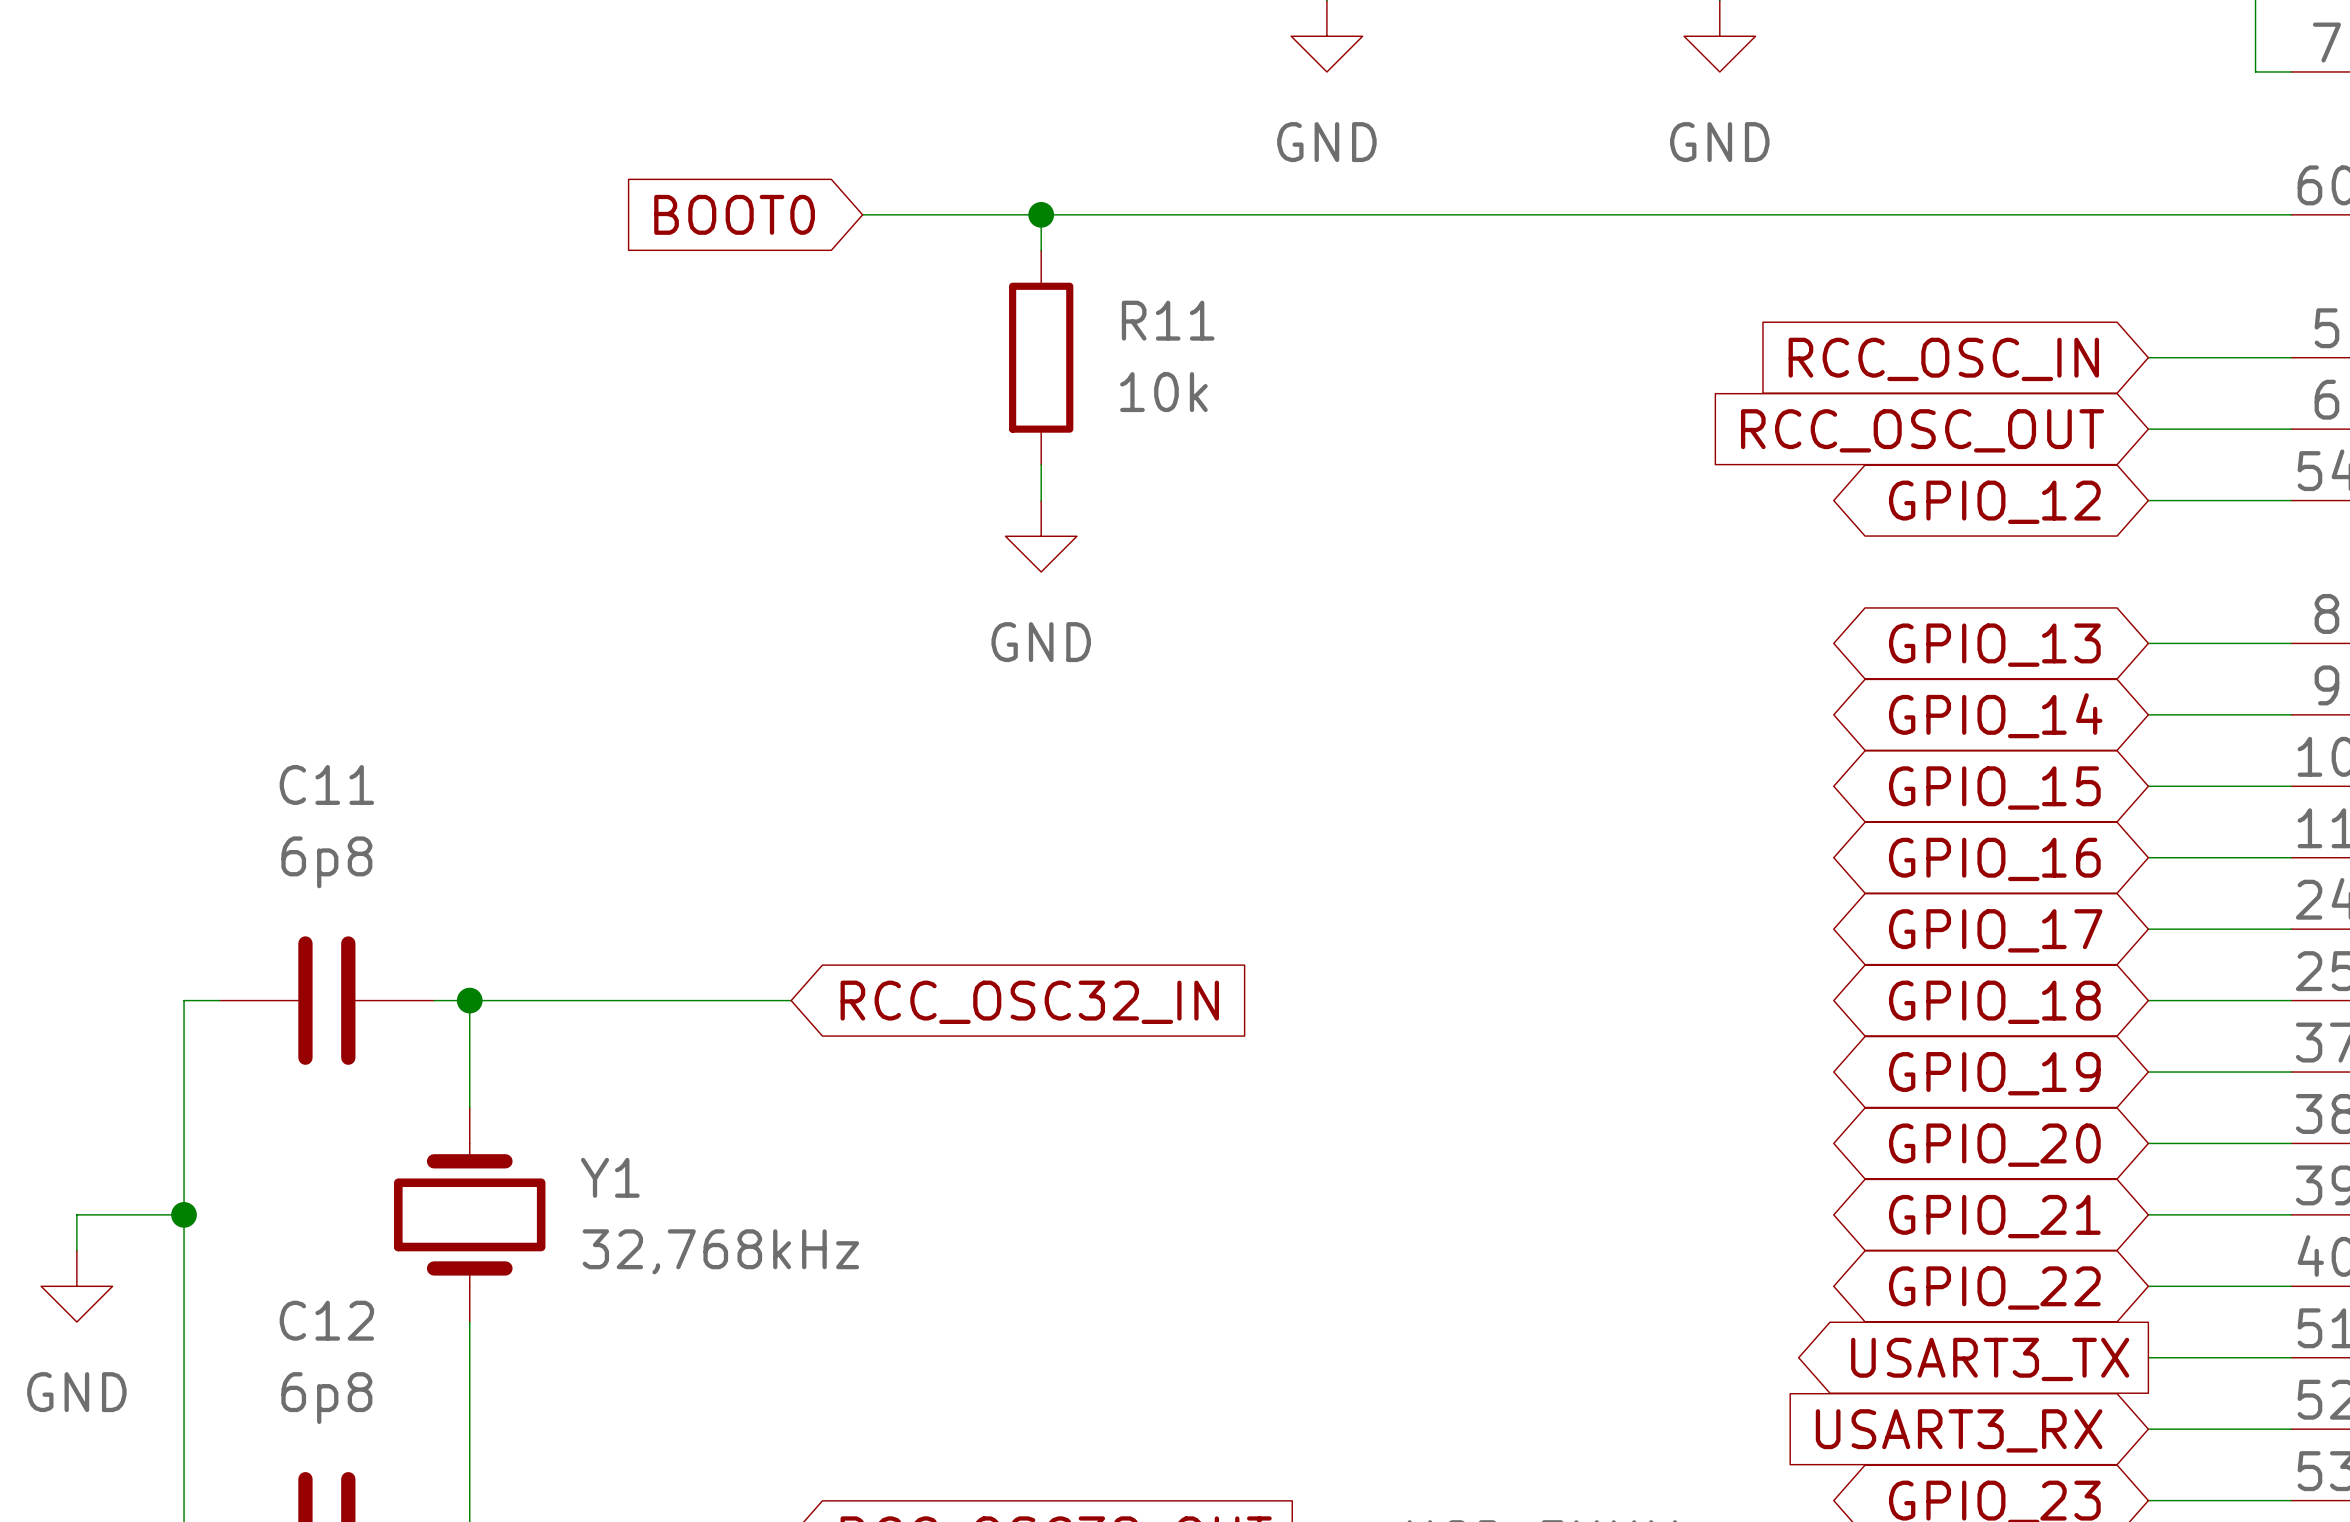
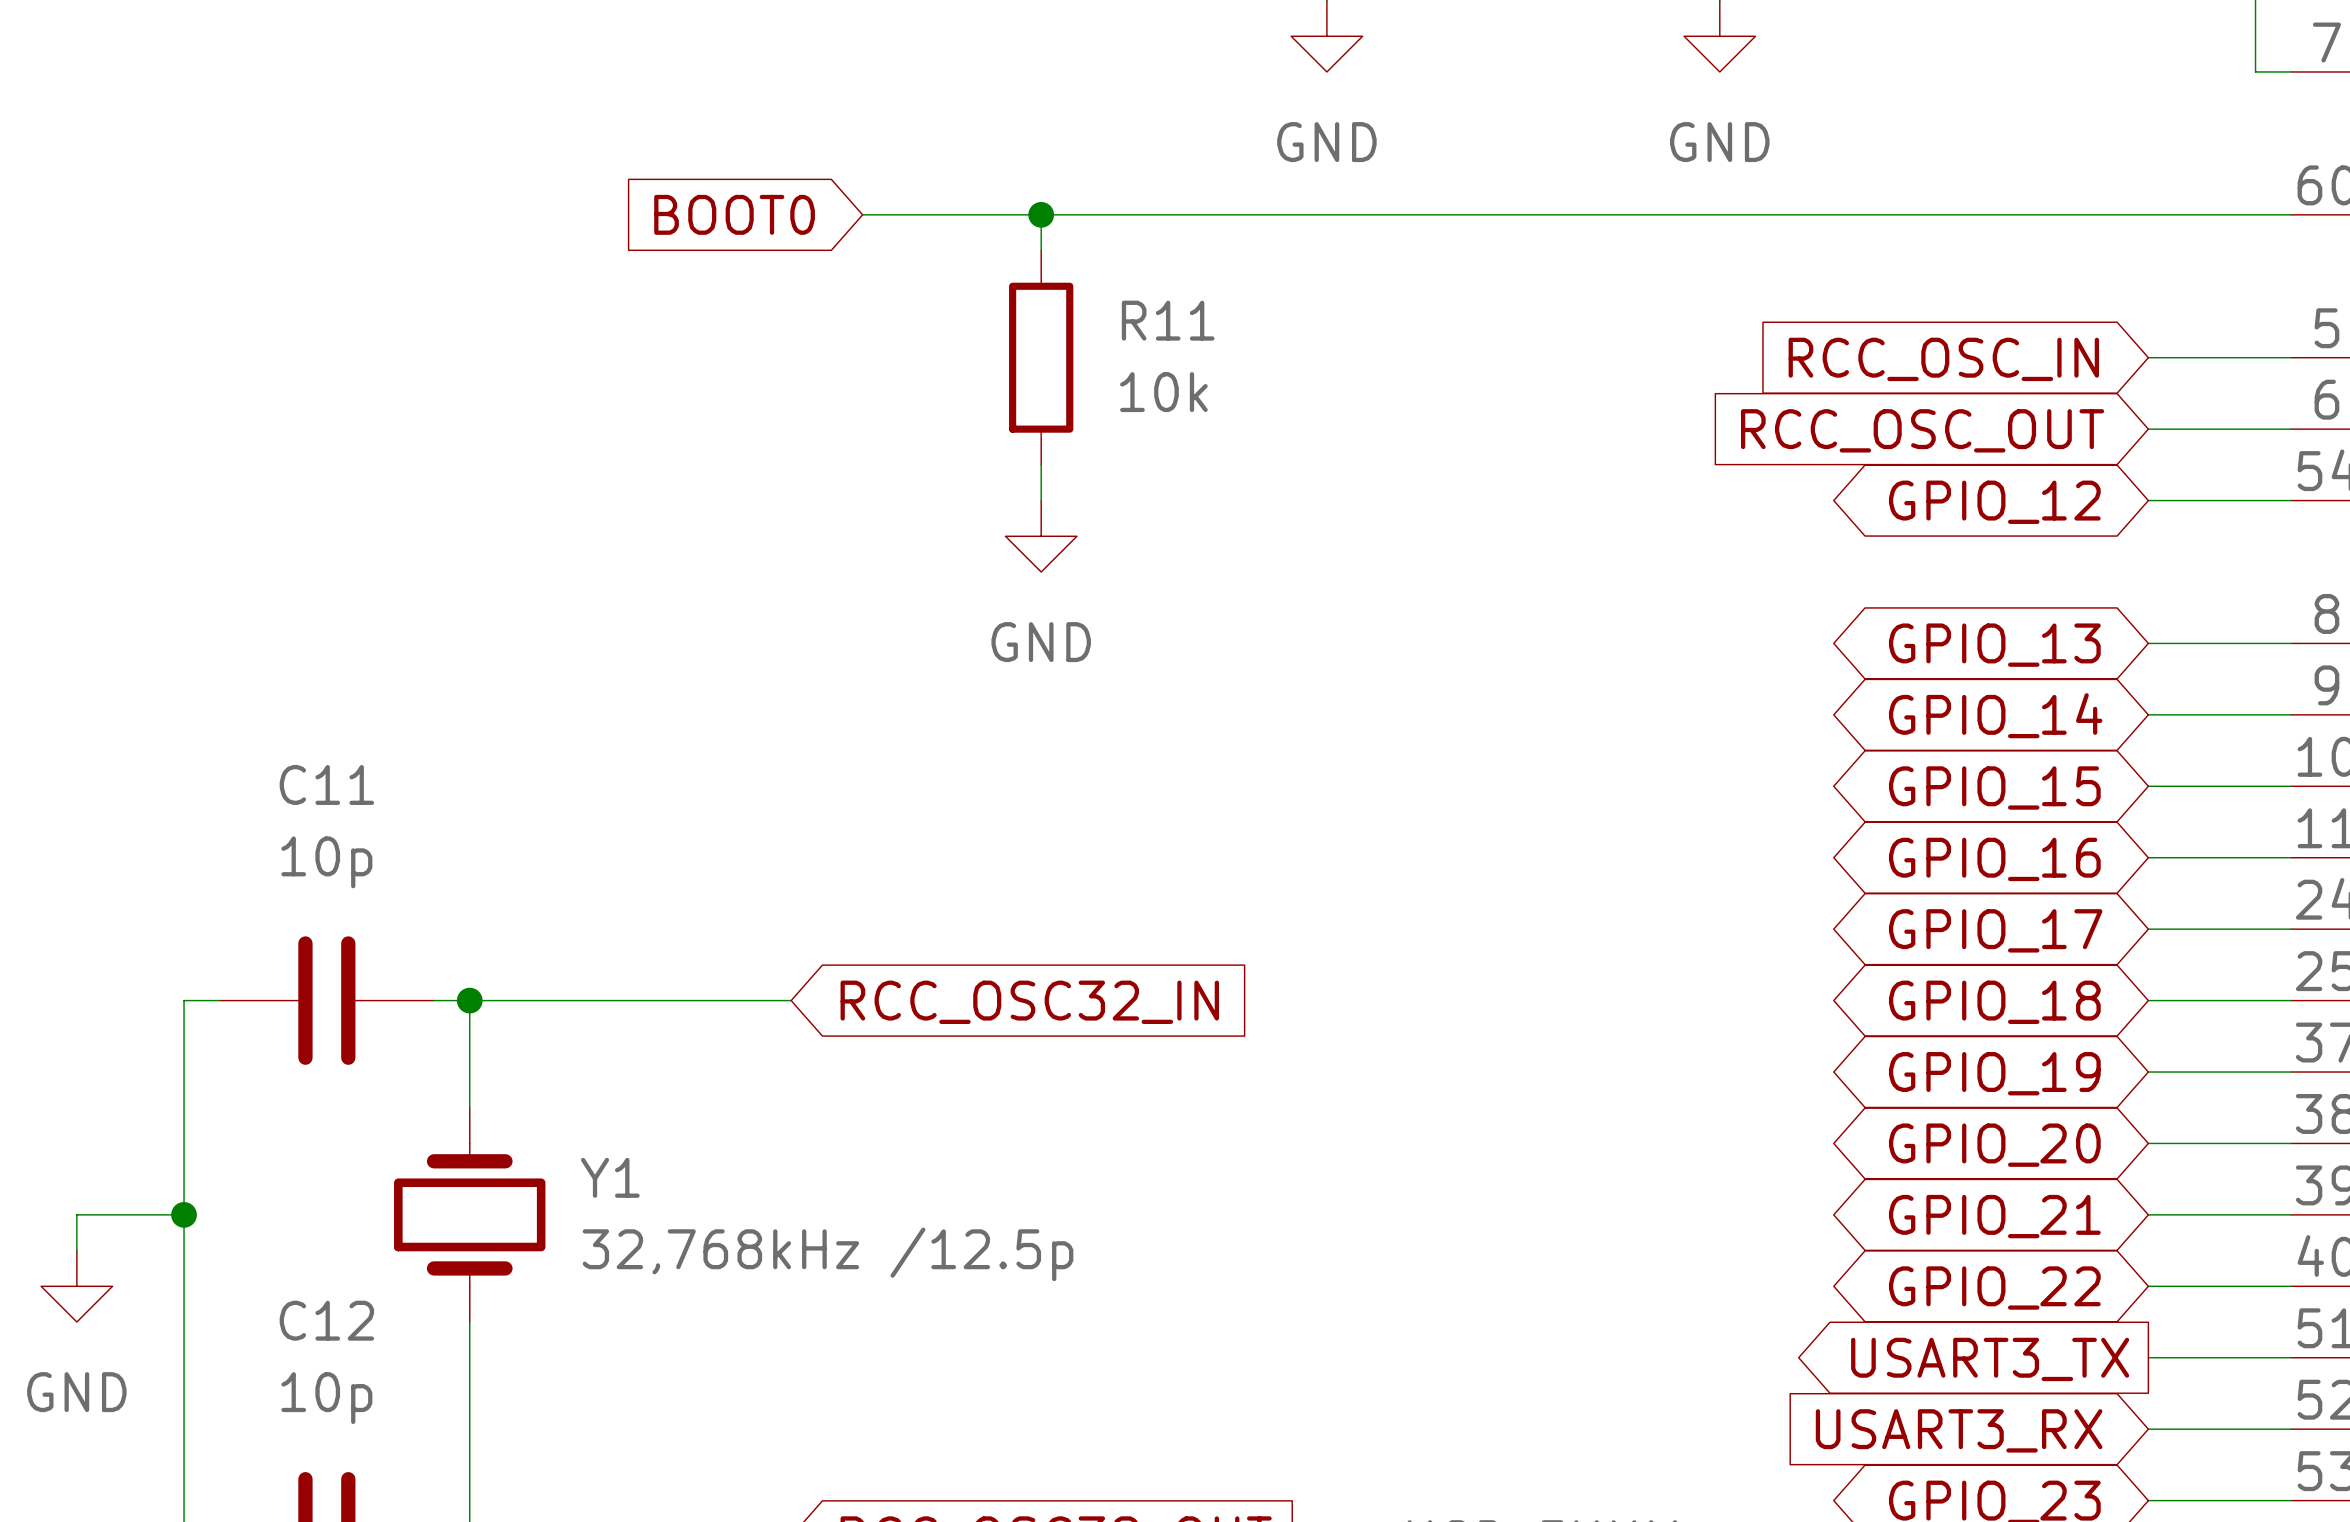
C11 value: 6p8 (326, 862) -> 10p (326, 862)
Y1 value: 32,768kHz (720, 1251) -> 32,768kHz /12.5p (828, 1254)
C12 value: 6p8 (326, 1398) -> 10p (326, 1398)

